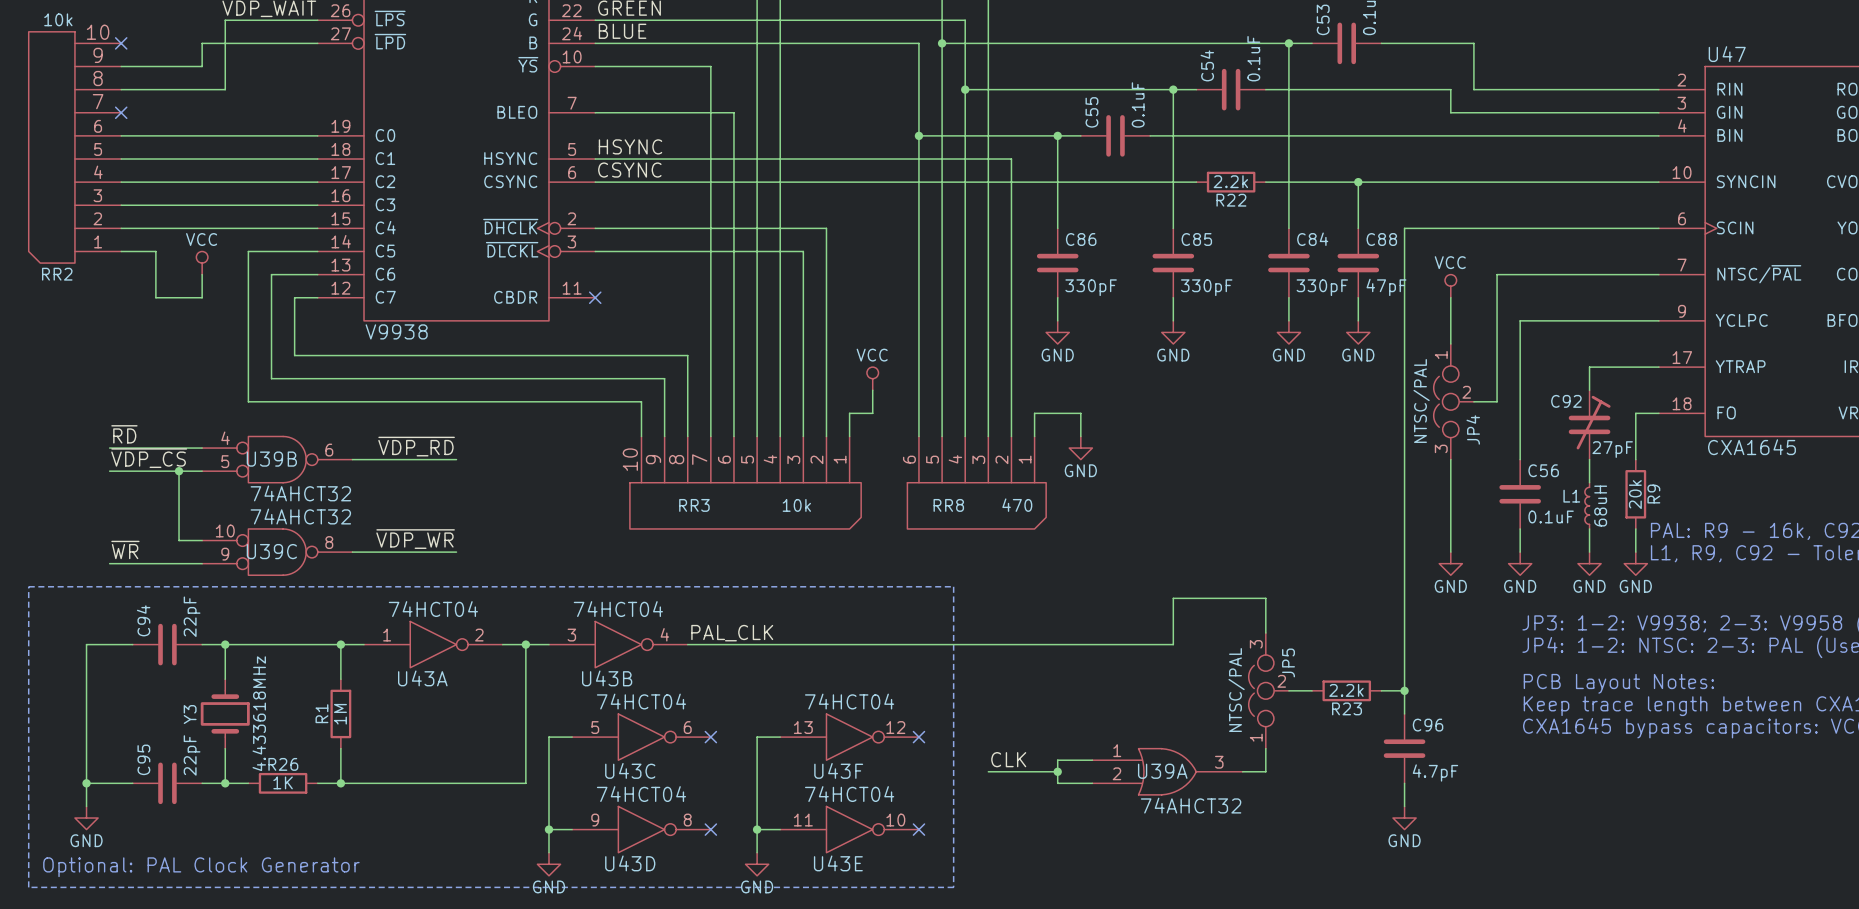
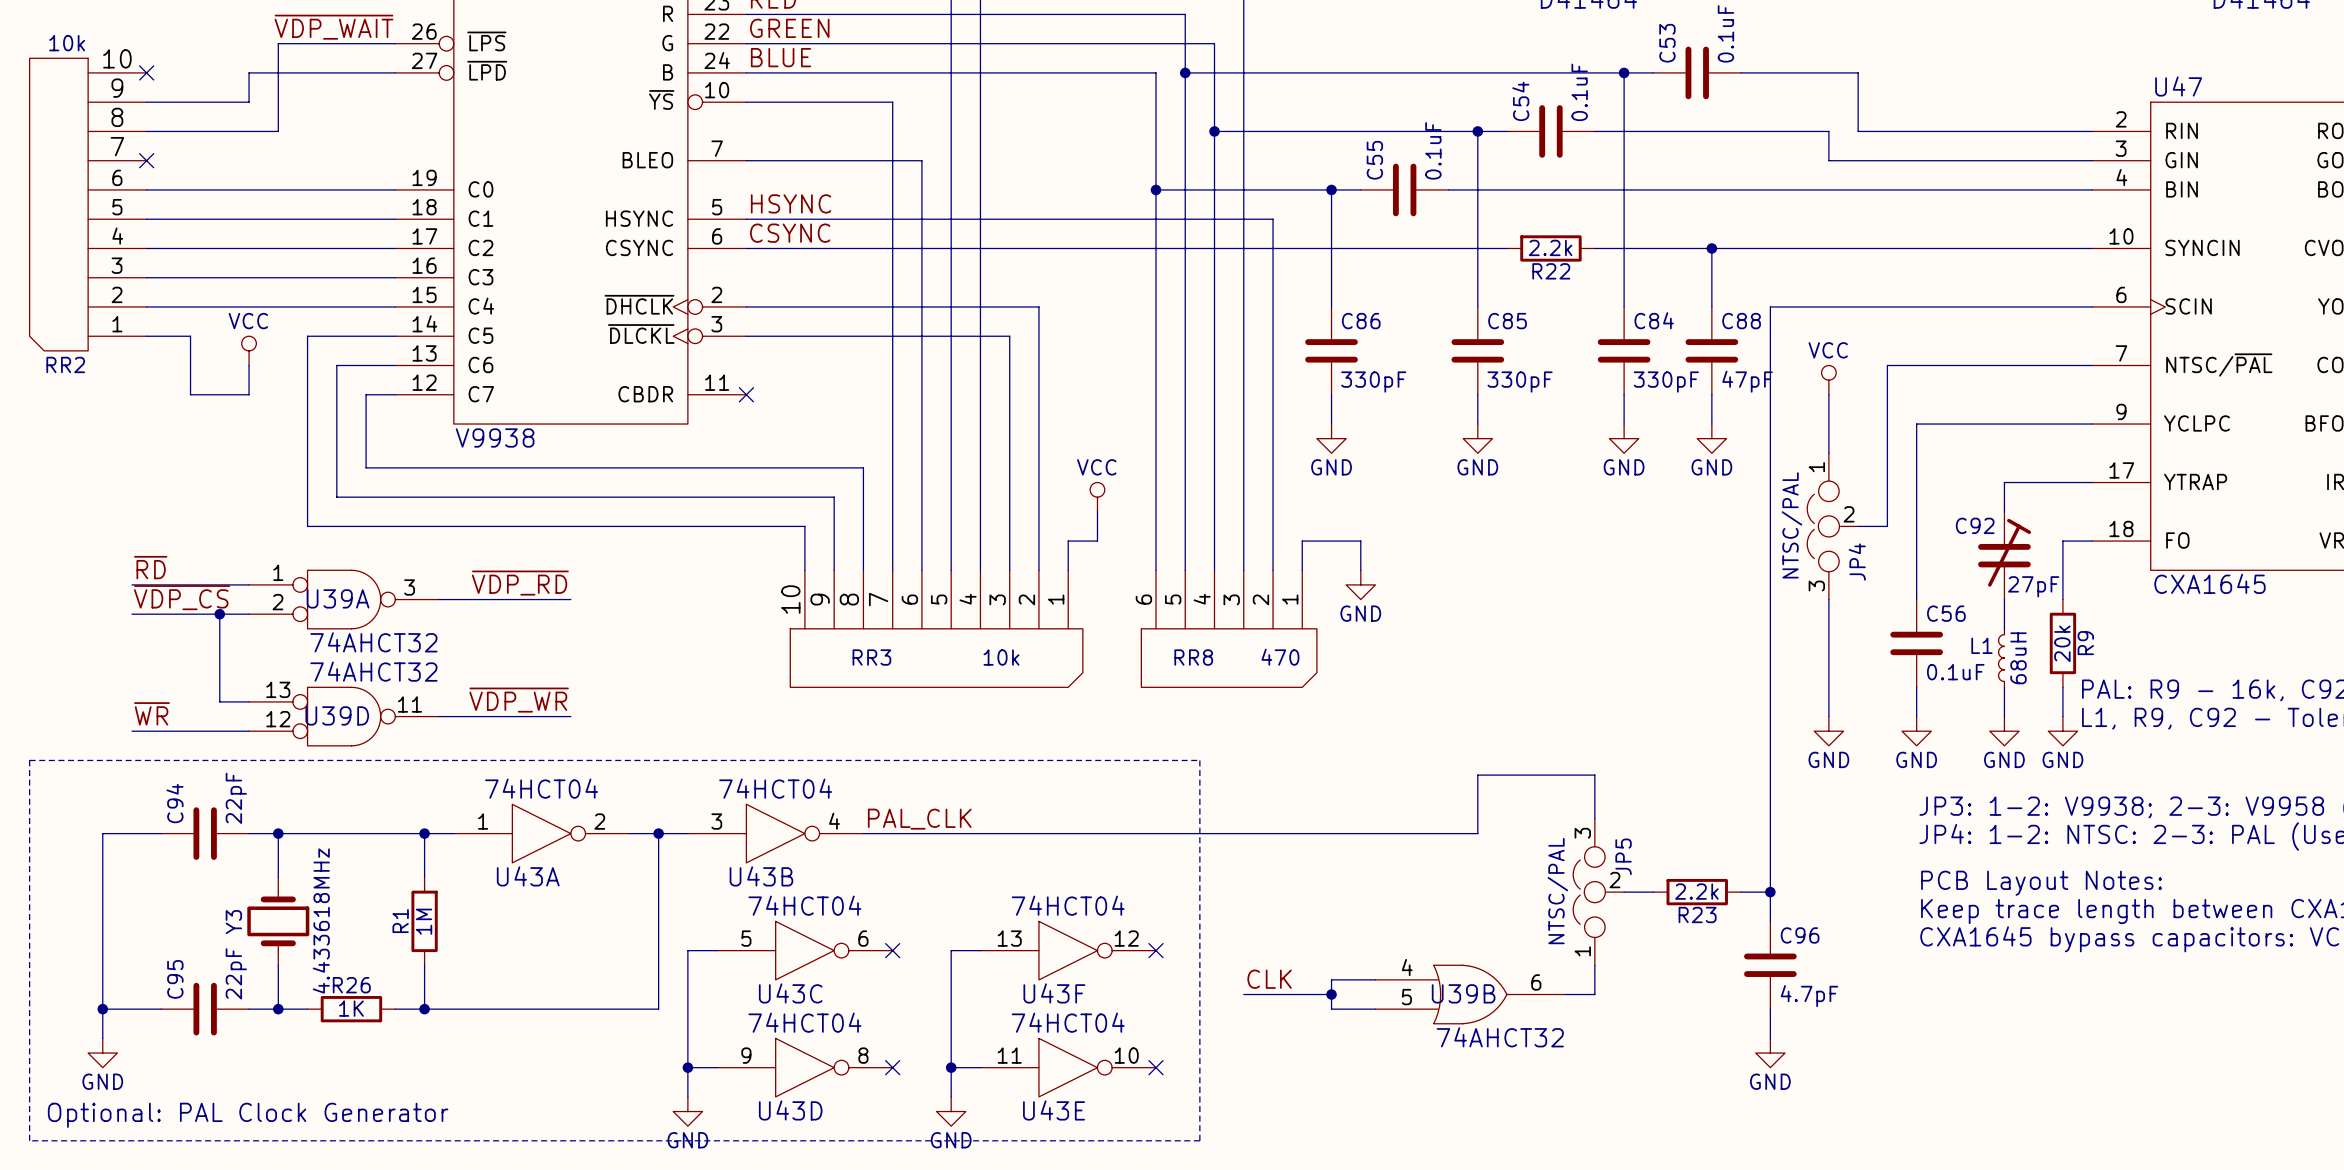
U39B symbol: [202, 436, 353, 483] -> [1375, 965, 1566, 1024]
U39C pin number: 10 (225, 531) -> 13 (278, 689)
U39C pin number: 8 (329, 542) -> 11 (409, 704)
U39C name: U39C (271, 551) -> U39D (337, 715)
U39C pin number: 9 (225, 554) -> 12 (278, 719)
U39A symbol: [1092, 748, 1243, 795] -> [249, 570, 440, 629]

